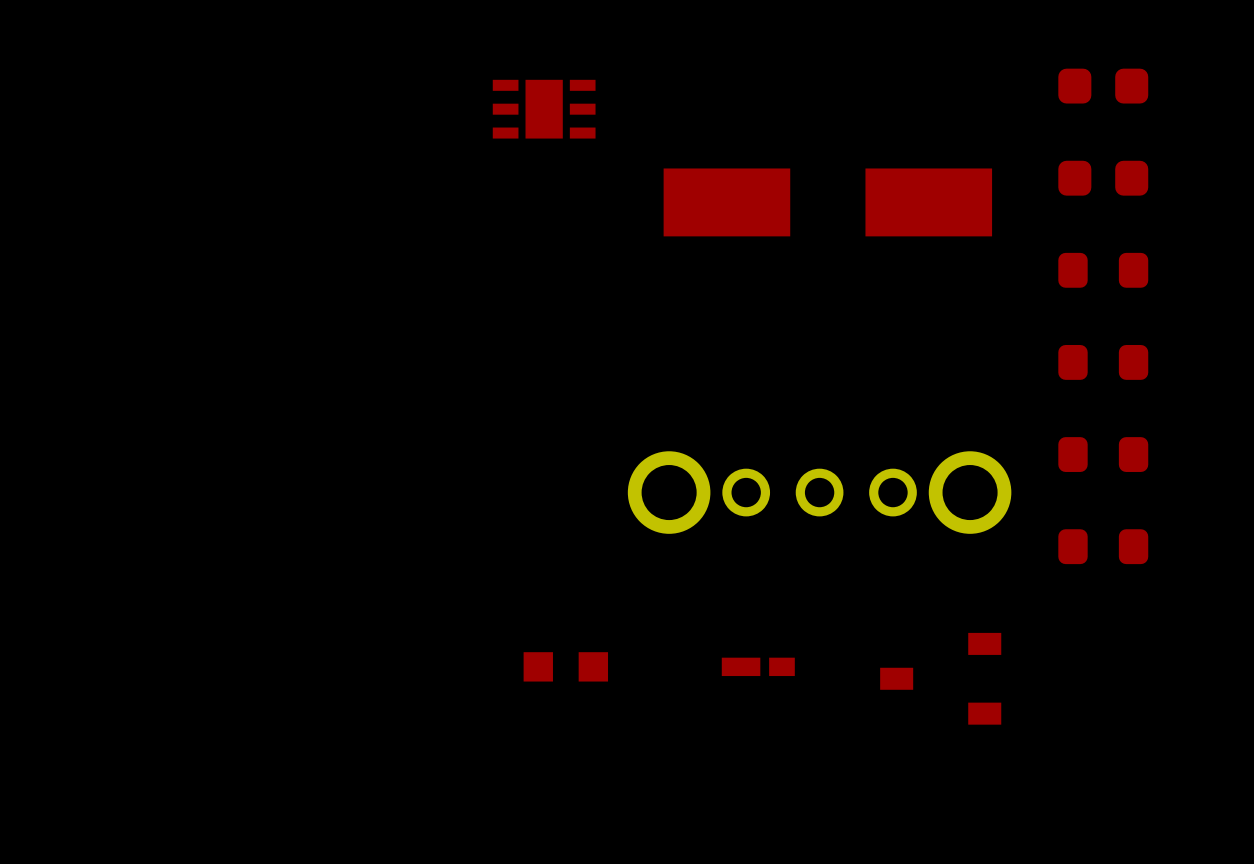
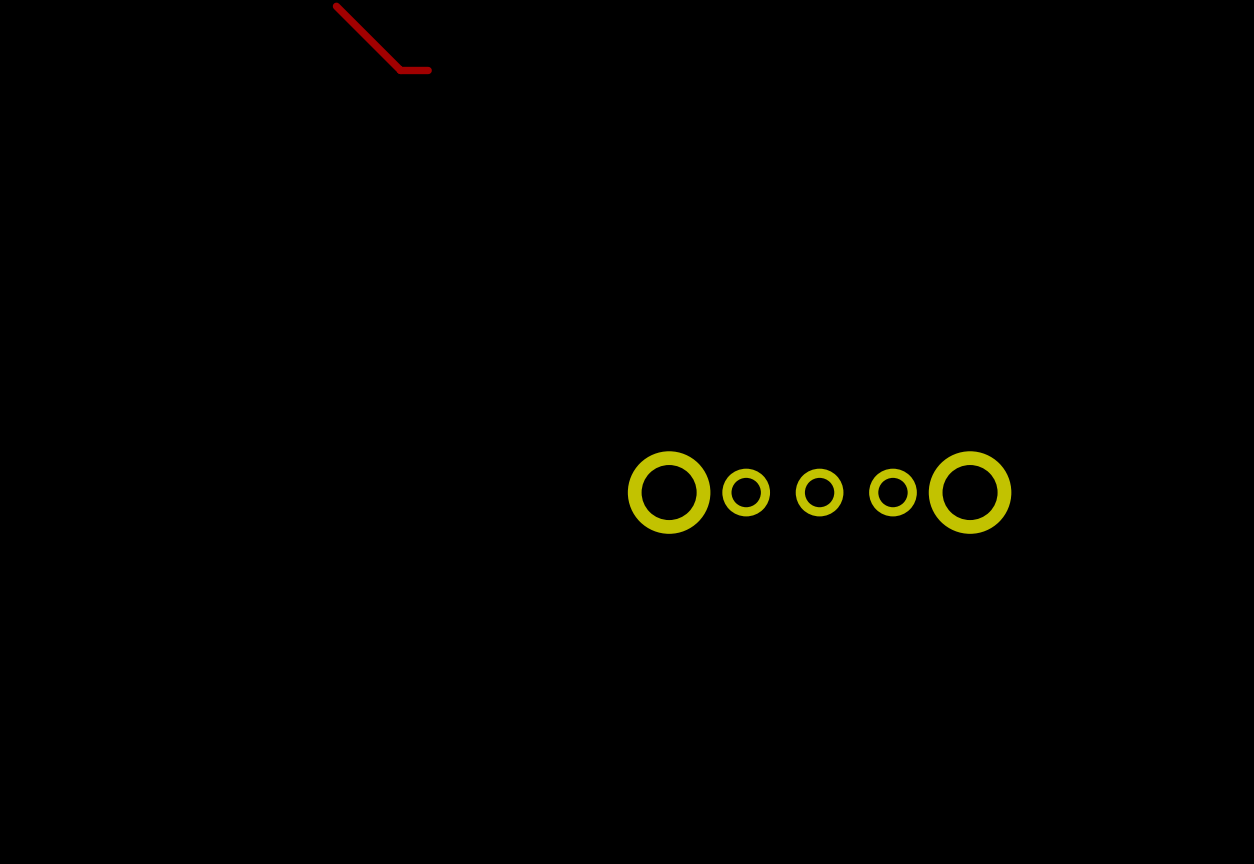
top track: none -> (336, 6) (400, 70) (428, 70)
part: (1103, 86) -> none
part: (544, 109) -> none
part: (1103, 178) -> none
part: (827, 202) -> none
part: (1103, 270) -> none
part: (1103, 362) -> none
part: (1103, 454) -> none
part: (1103, 546) -> none
part: (565, 666) -> none
part: (758, 666) -> none
part: (940, 678) -> none

